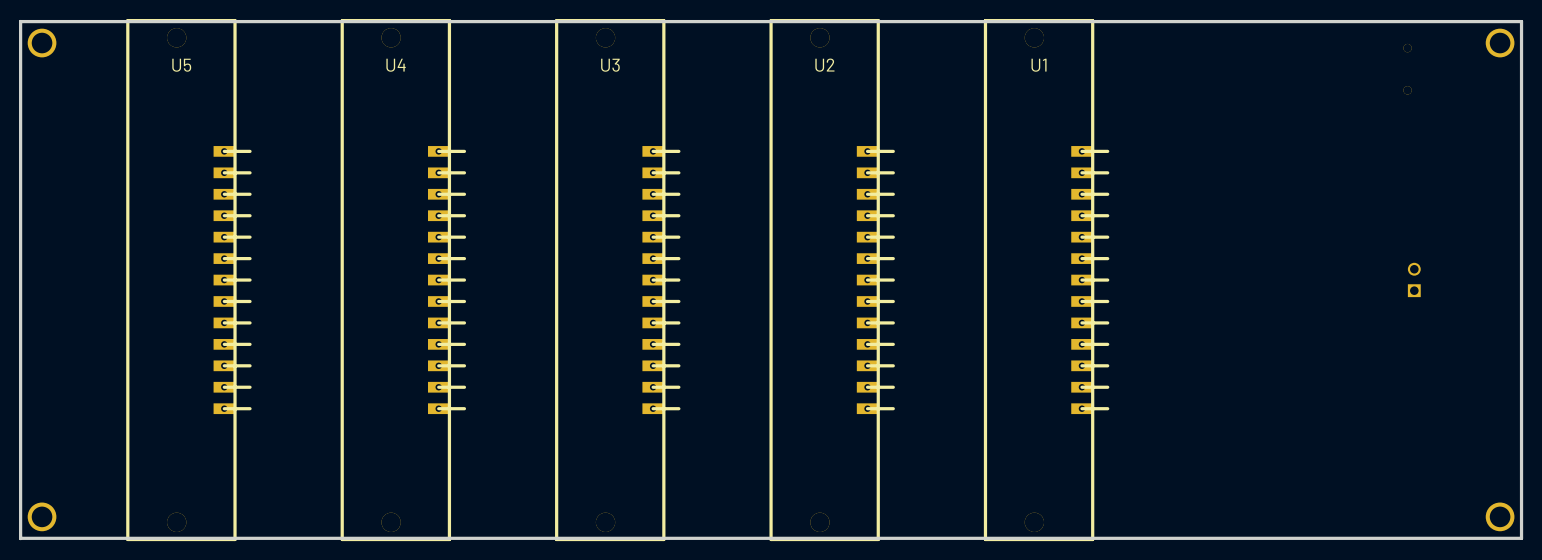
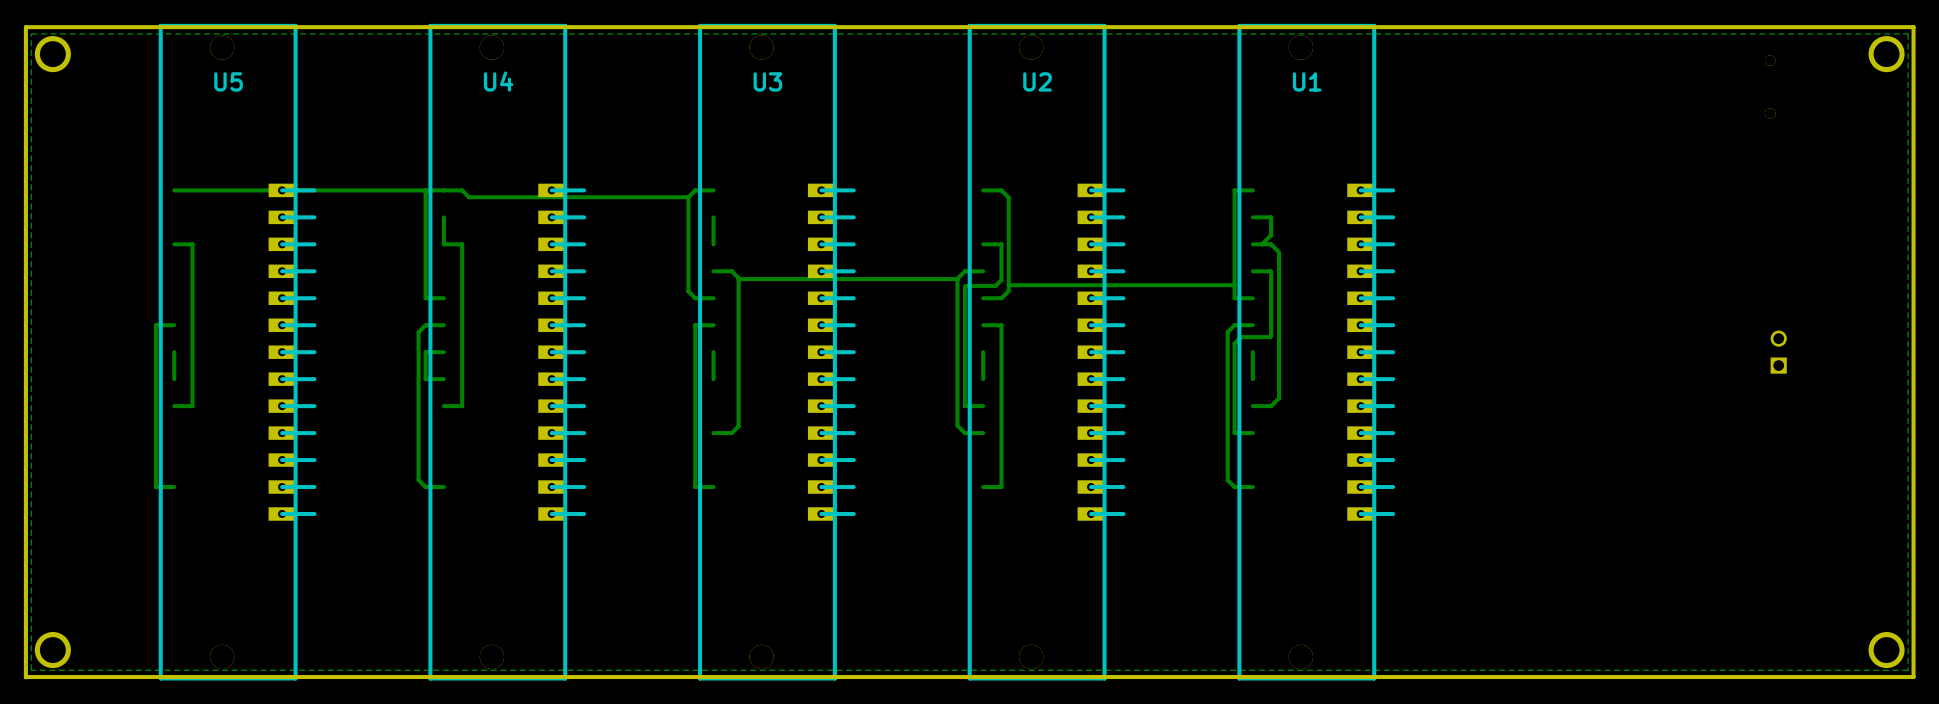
zone outline: none -> (1908, 33) (31, 33) (31, 670) (1908, 670) (1908, 33)
track: none -> (174, 190) (462, 190) (468, 197) (688, 197)
track: none -> (425, 190) (425, 298) (443, 298)
track: none -> (713, 190) (695, 190) (688, 197)
track: none -> (983, 190) (1001, 190) (1008, 197) (1008, 290) (1001, 298) (983, 298)
track: none -> (1252, 190) (1234, 190) (1234, 298) (1252, 298)
track: none -> (688, 197) (688, 291) (695, 298) (713, 298)
track: none -> (443, 217) (443, 244) (462, 244) (462, 406) (443, 406)
track: none -> (713, 217) (713, 244)
track: none -> (1252, 217) (1271, 217) (1271, 235) (1262, 244)
track: none -> (174, 244) (192, 244) (192, 406) (174, 406)
track: none -> (983, 244) (1001, 244) (1001, 280) (995, 285) (964, 287) (964, 406) (983, 406)
track: none -> (1252, 244) (1271, 244) (1279, 252) (1279, 398) (1271, 406) (1252, 406)
track: none -> (713, 271) (731, 271) (738, 278) (738, 426) (731, 433) (713, 433)
track: none -> (983, 271) (964, 271) (957, 278) (957, 425) (964, 433) (983, 433)
track: none -> (1252, 271) (1271, 271) (1271, 335) (1240, 337) (1234, 343) (1234, 433) (1252, 433)
track: none -> (957, 279) (738, 279)
track: none -> (1234, 285) (1008, 285)
track: none -> (174, 325) (155, 325) (155, 487) (174, 487)
track: none -> (443, 325) (425, 325) (418, 332) (418, 480) (425, 487) (443, 487)
track: none -> (713, 325) (695, 325) (695, 487) (713, 487)
track: none -> (983, 325) (1001, 325) (1001, 487) (983, 487)
track: none -> (1252, 325) (1234, 325) (1227, 332) (1227, 480) (1234, 487) (1252, 487)
track: none -> (174, 352) (174, 379)
track: none -> (443, 352) (425, 352) (425, 379) (443, 379)
track: none -> (713, 352) (713, 379)
track: none -> (983, 352) (983, 379)
track: none -> (1252, 352) (1252, 379)

